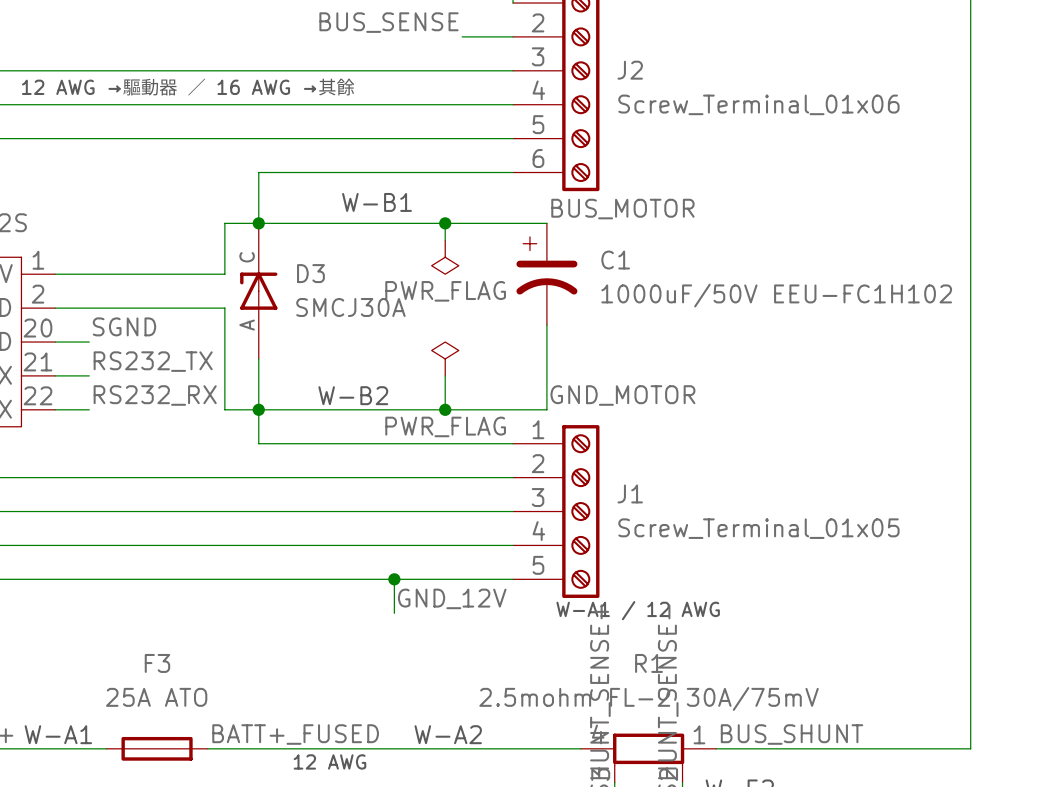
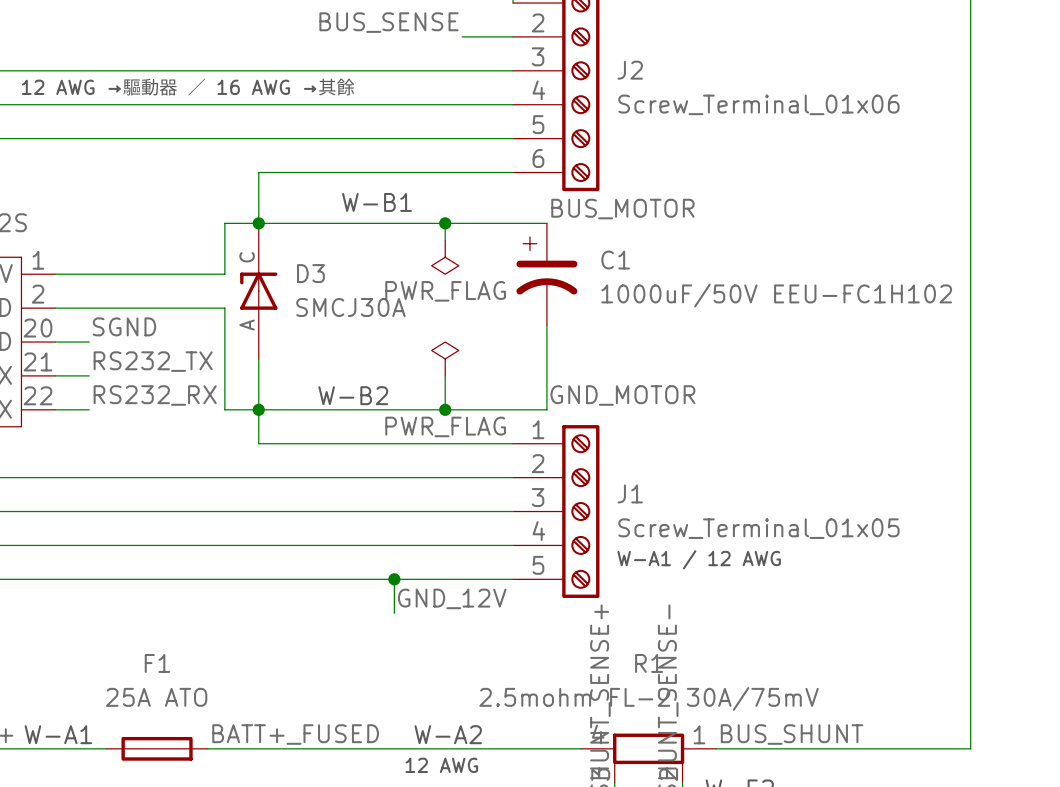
text position: W-A1 / 12 AWG (638, 610) -> W-A1 / 12 AWG (699, 559)
F3 name: F3 (157, 663) -> F1 (157, 663)
text position: 12 AWG (329, 761) -> 12 AWG (441, 765)

